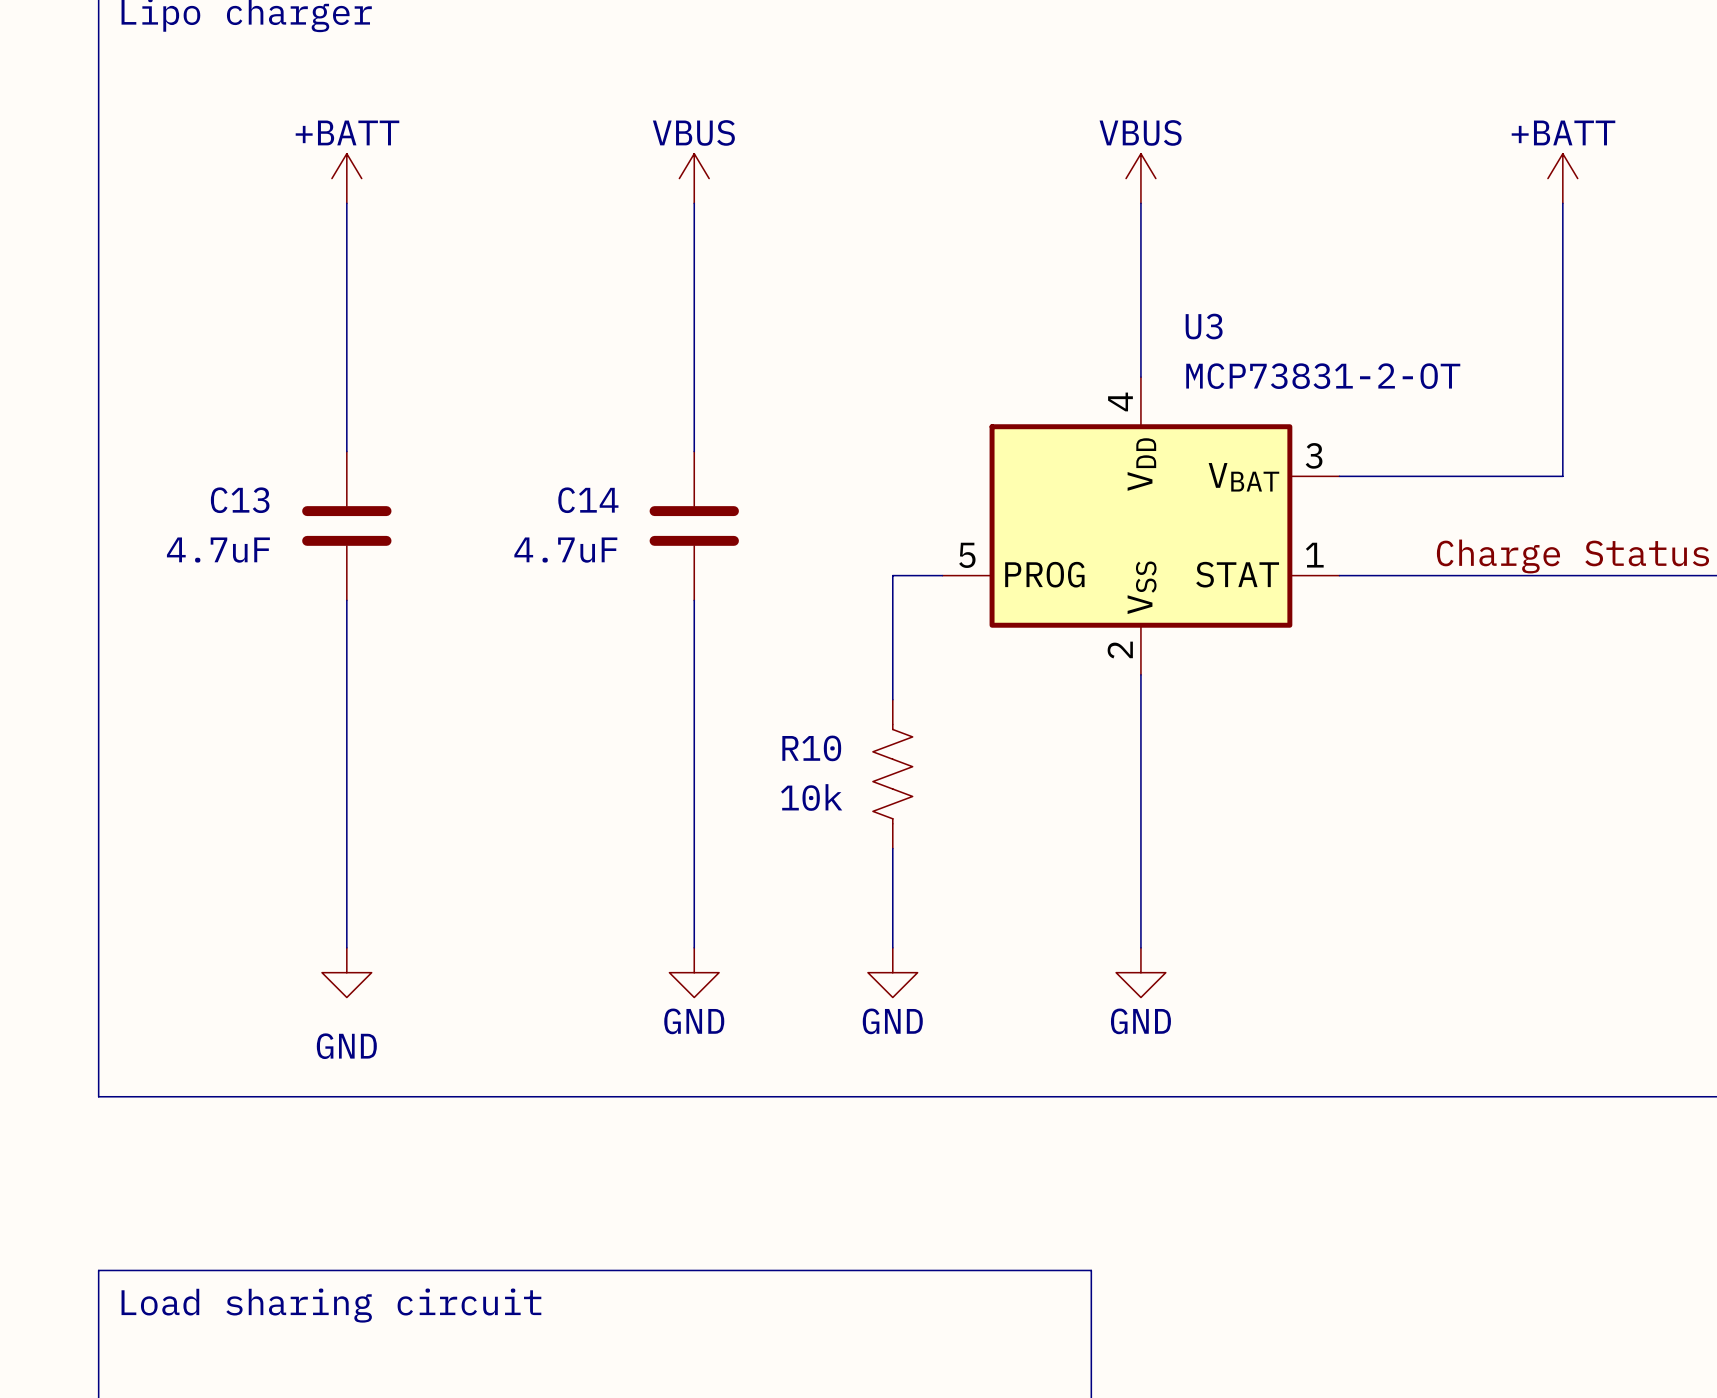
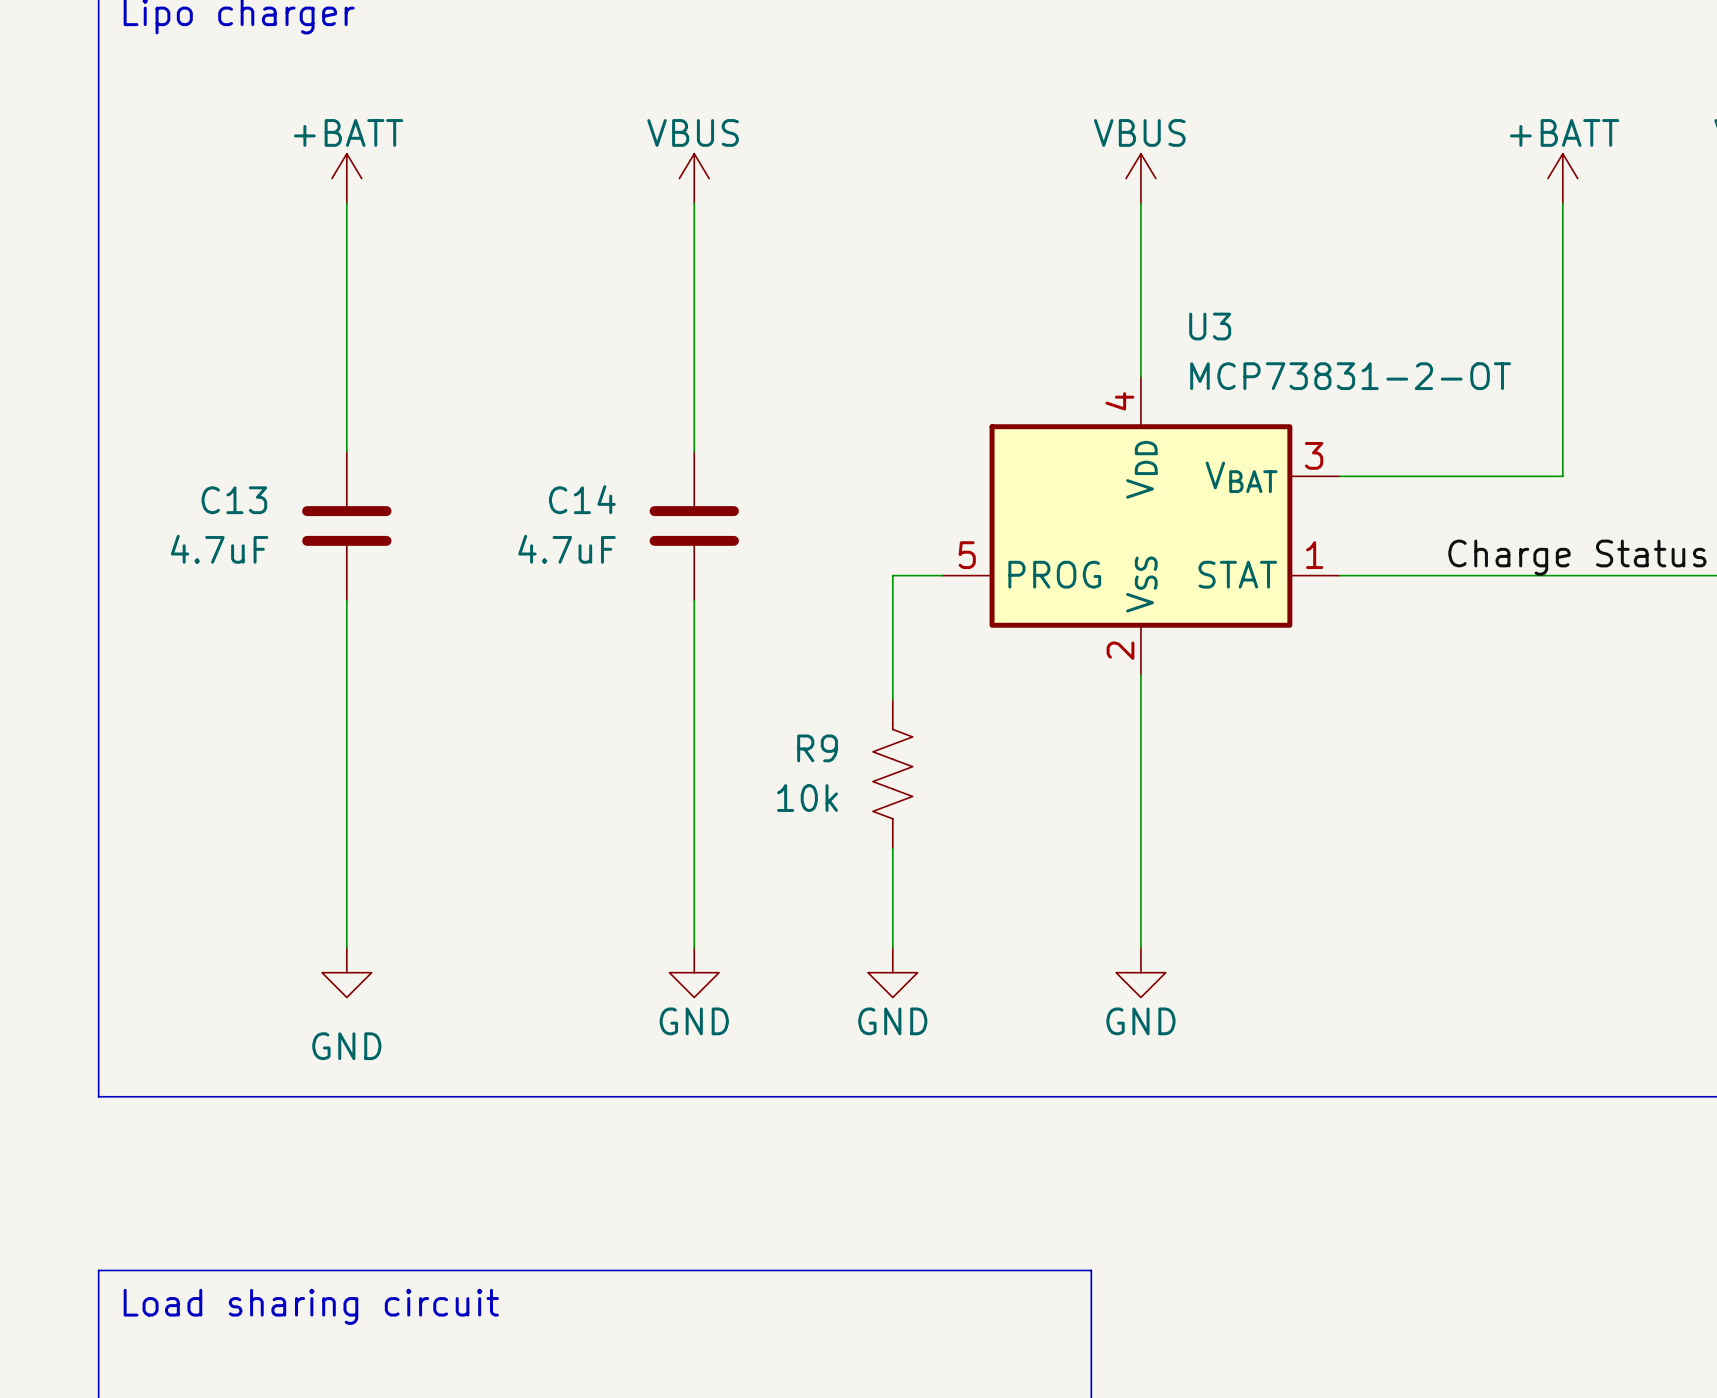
R10 name: R10 (811, 748) -> R9 (817, 748)

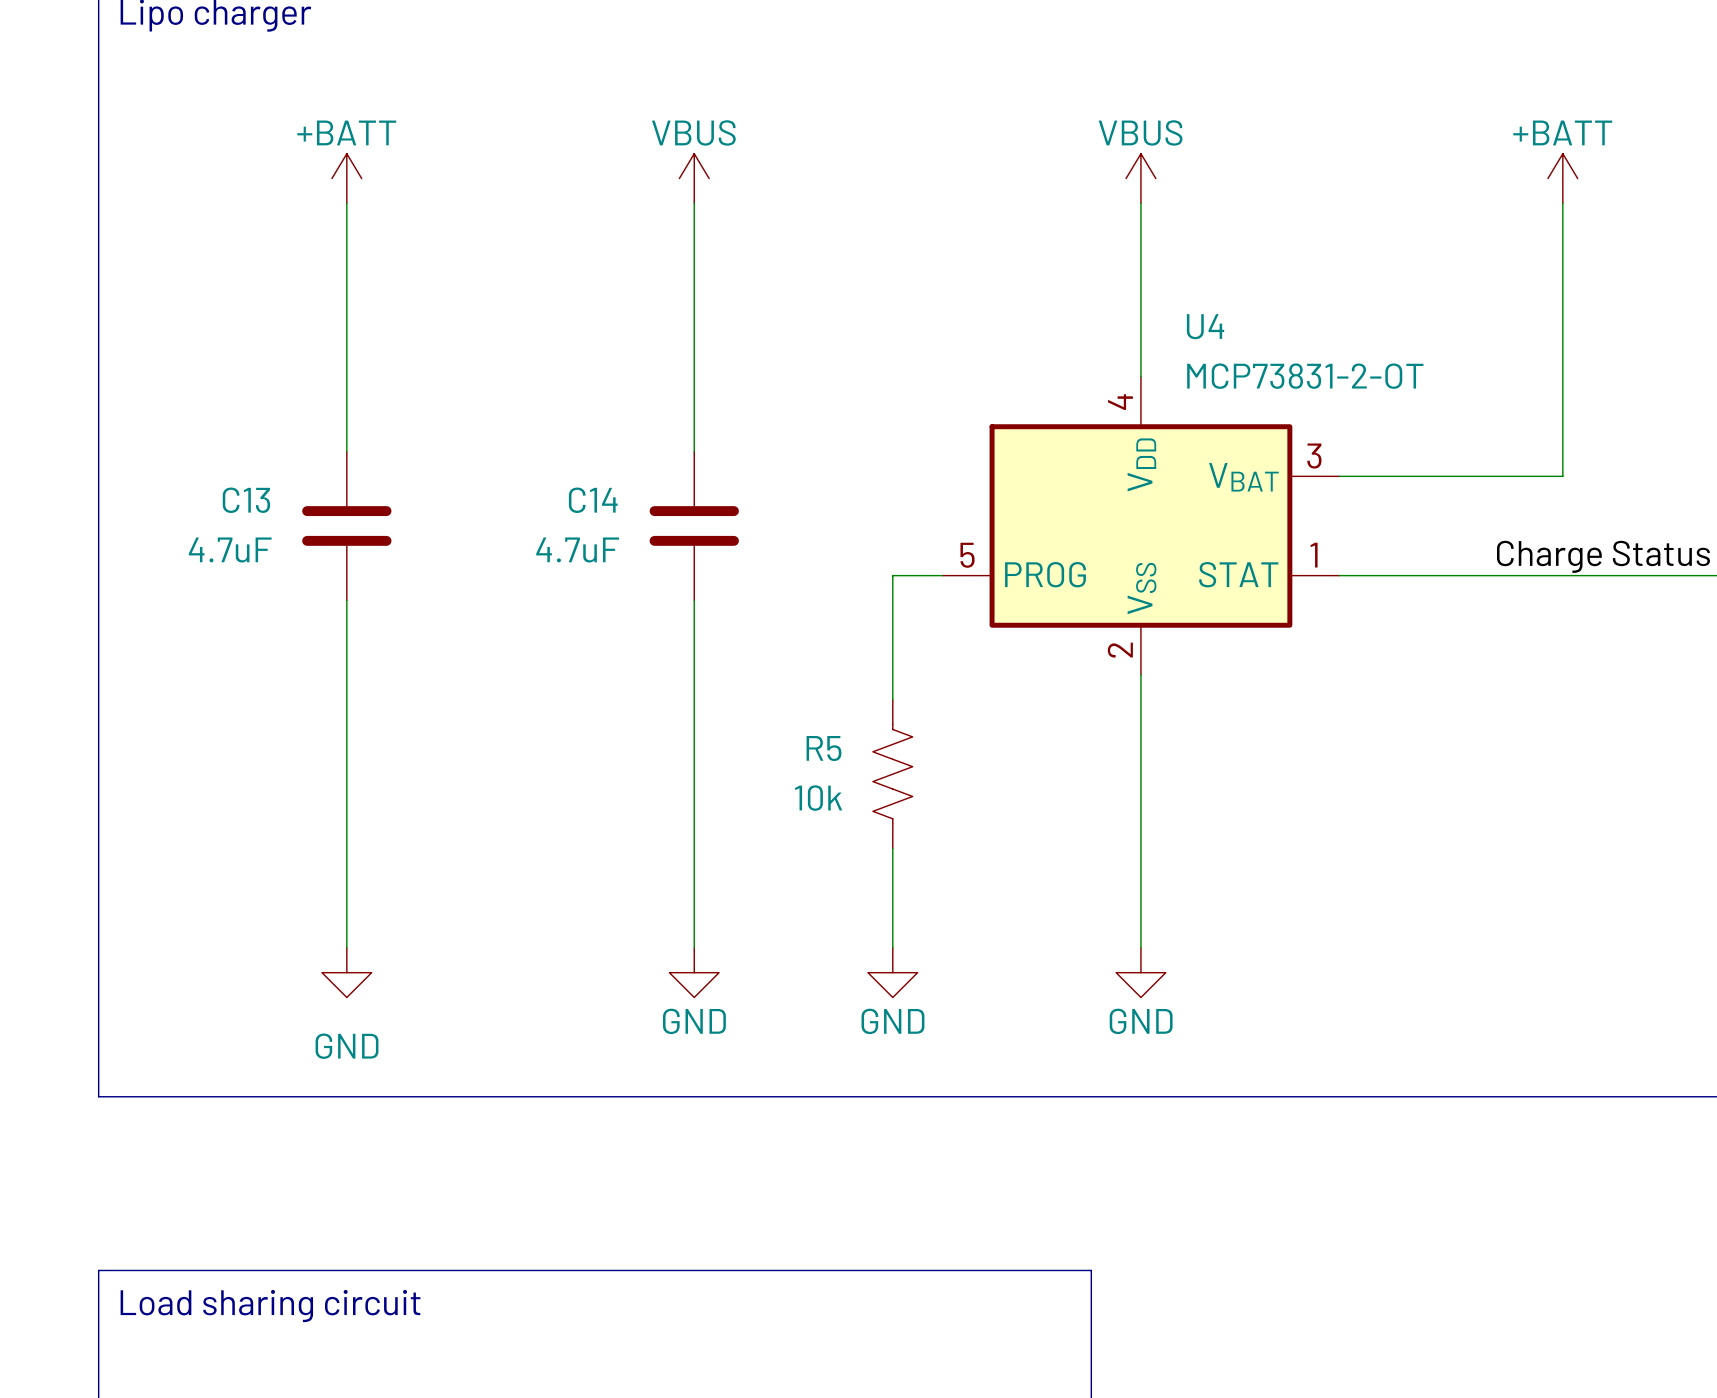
U3 name: U3 (1210, 326) -> U4 (1205, 326)
R9 name: R9 (817, 748) -> R5 (823, 748)

